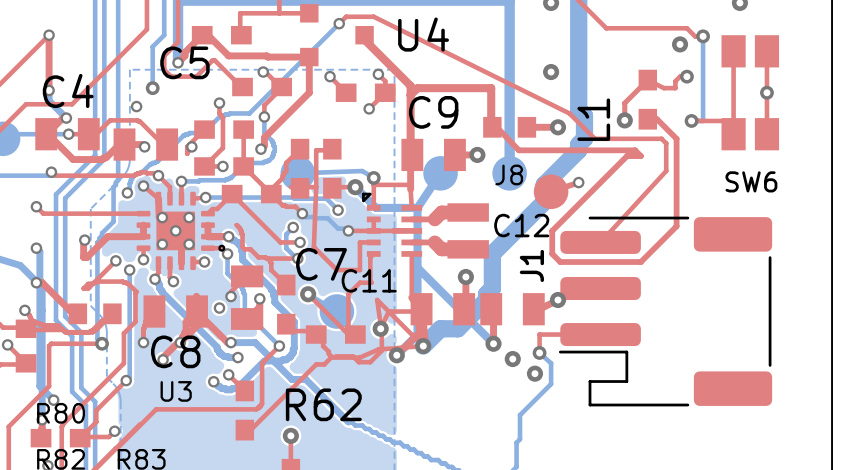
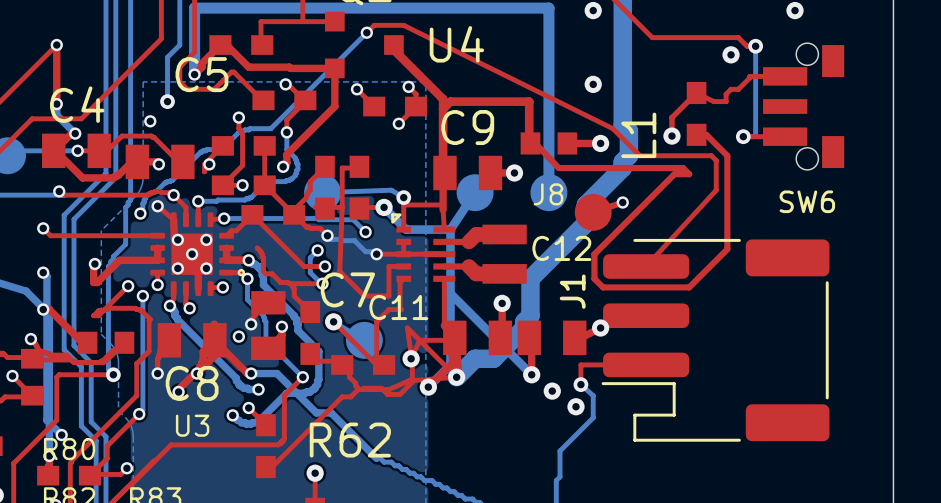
SW6 footprint: [721, 35, 780, 151] -> [763, 43, 845, 170]
top track: (733, 51) (733, 134) -> none
top track: (766, 51) (766, 134) -> none
top track: none -> (785, 76) (750, 76) (738, 89)
via: (686, 76) -> none
via: (766, 92) -> none

